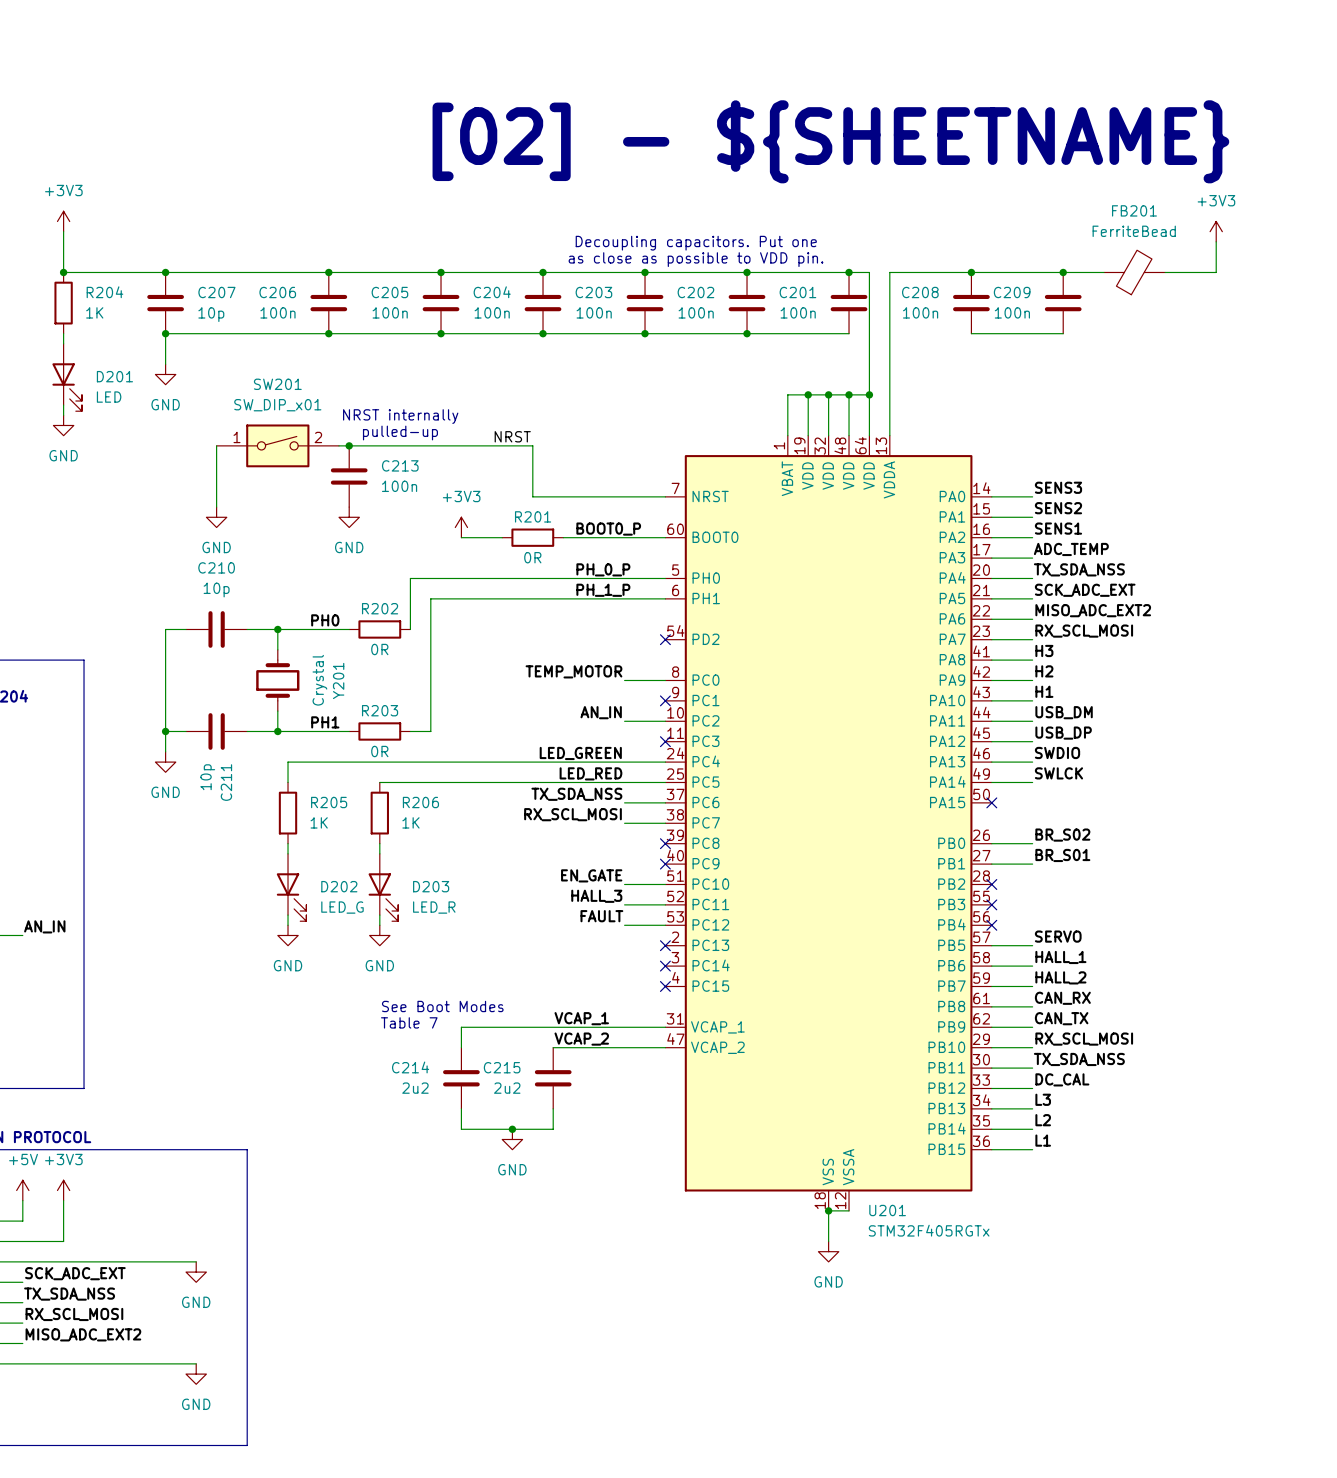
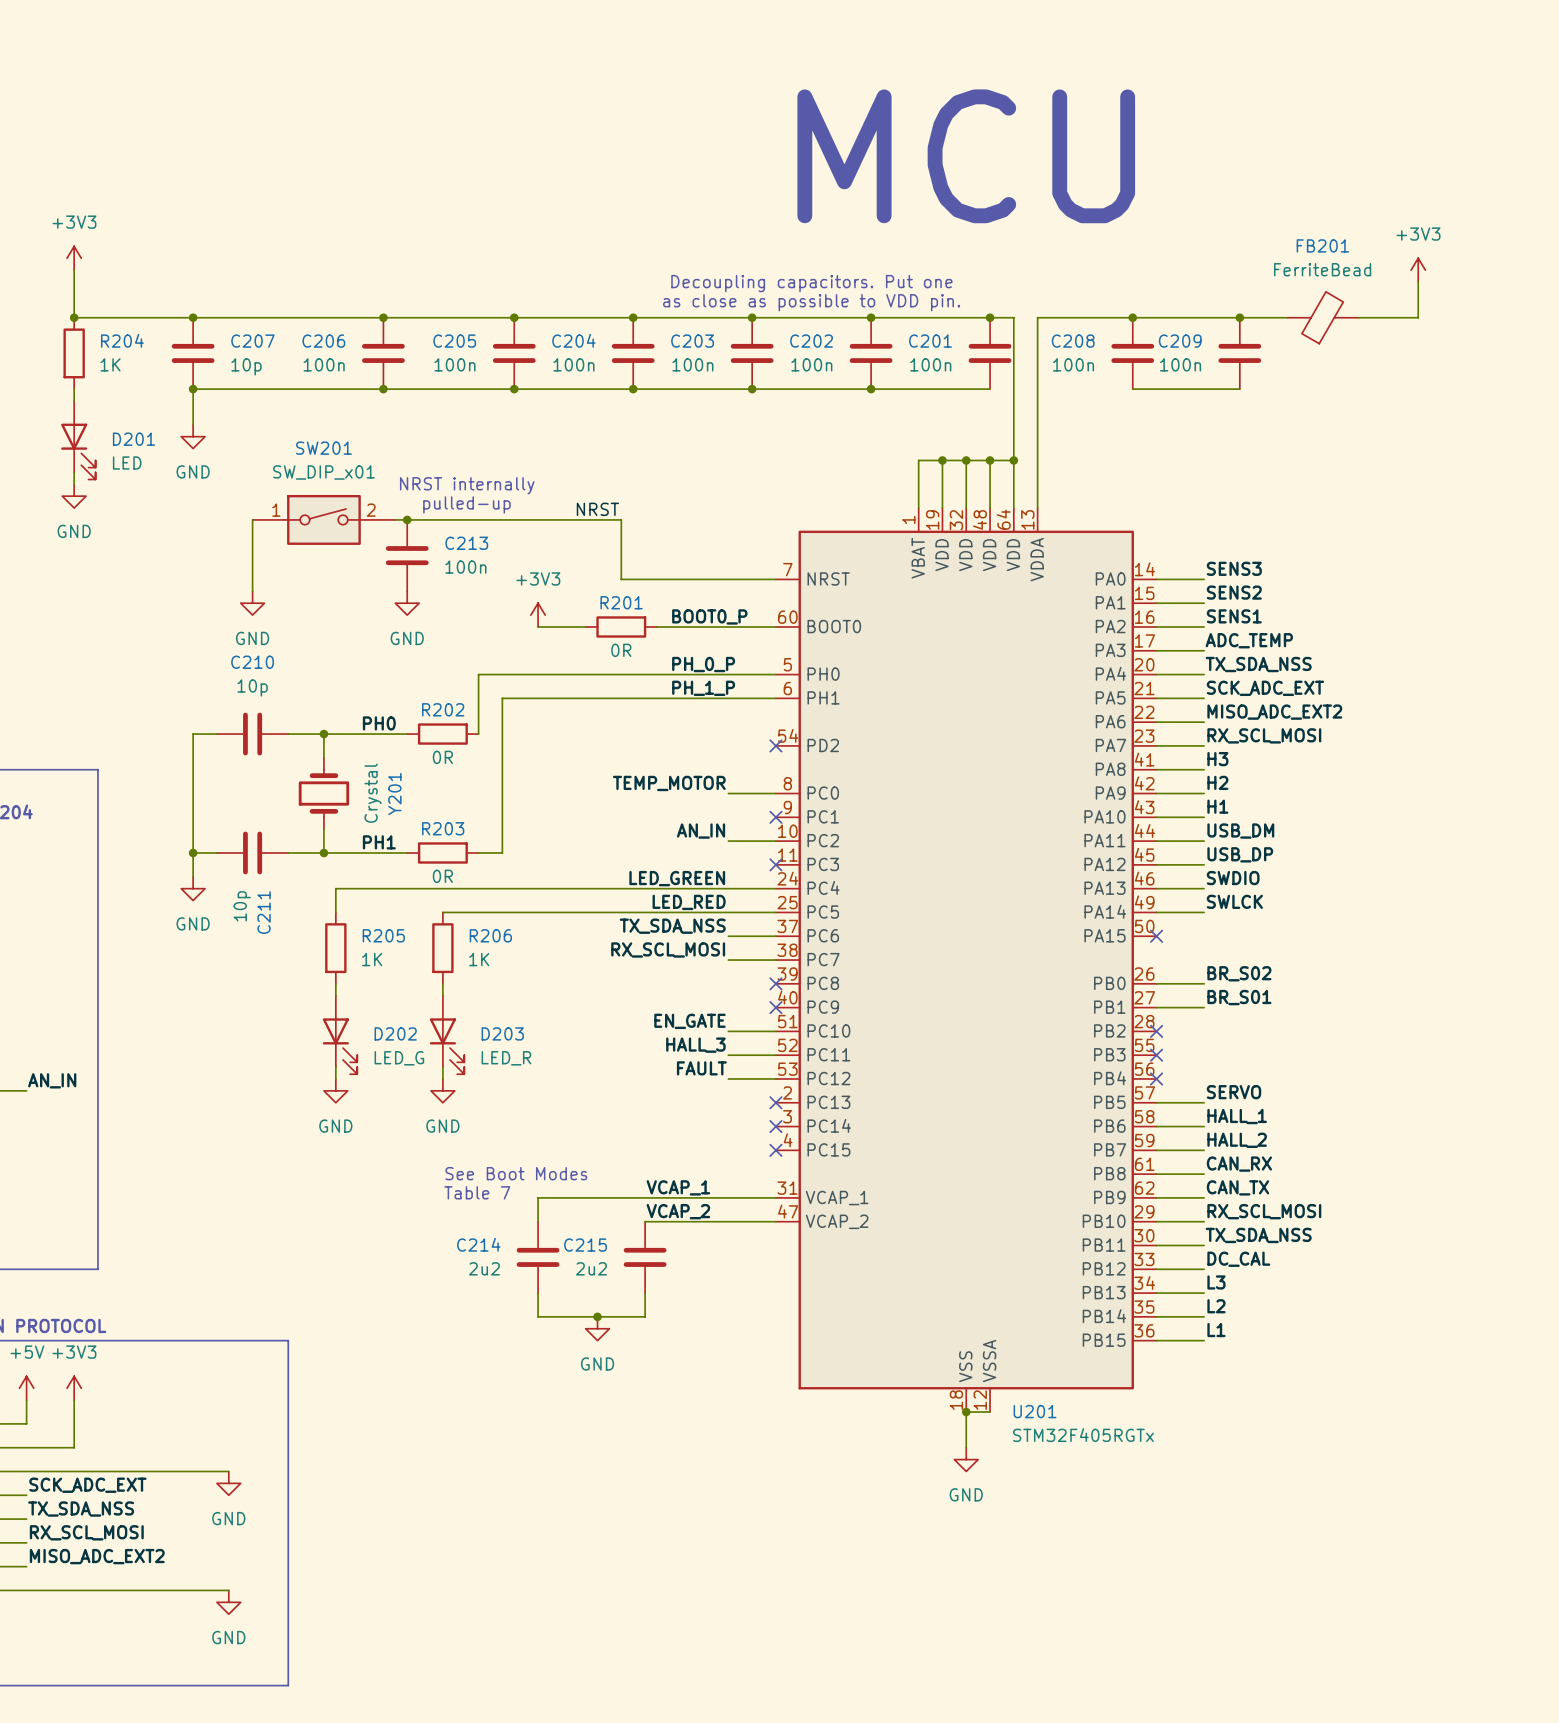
text: [02] - ${SHEETNAME} (830, 141) -> MCU (966, 156)

